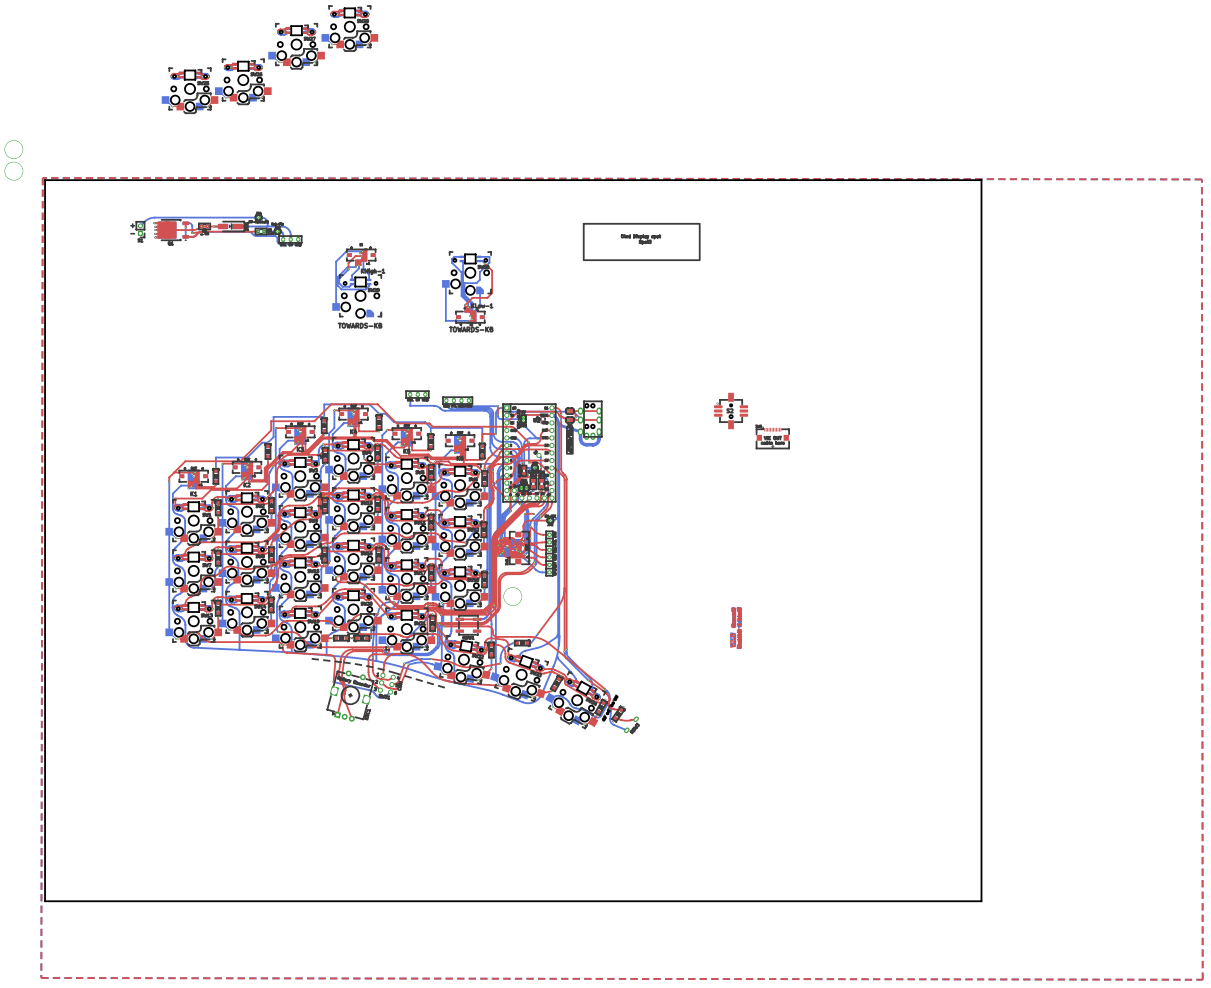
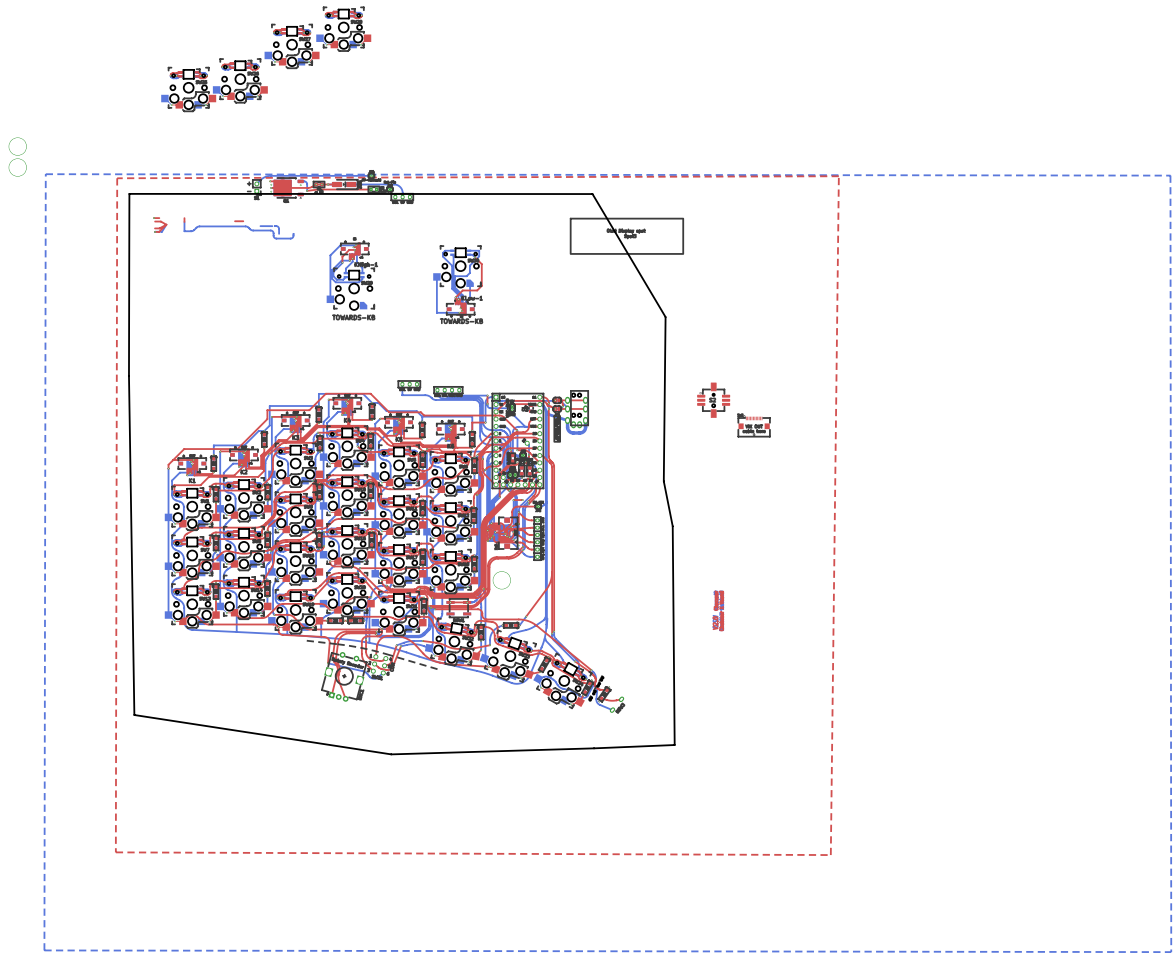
top zone outline: (42, 178) (41, 978) (1202, 979) (1201, 179) (42, 178) -> (838, 176) (117, 178) (115, 852) (830, 855) (838, 176)
bottom track: none -> (370, 175) (269, 175) (262, 178) (256, 183)
board edge: (45, 180) (981, 180) (981, 901) (45, 901) (45, 180) -> none
top track: none -> (270, 181) (275, 181)
via: none -> (270, 181)
bottom track: none -> (300, 181) (306, 182) (307, 190)
via: none -> (271, 184)
via: none -> (328, 184)
top track: none -> (336, 184) (316, 184) (308, 187) (271, 187)
bottom track: none -> (351, 184) (396, 184) (401, 189) (402, 197)
via: none -> (300, 185)
via: none -> (271, 187)
top track: none -> (371, 189) (307, 190)
via: none -> (307, 190)
via: none -> (271, 191)
board edge: none -> (129, 193) (592, 194) (665, 317) (663, 481) (672, 526) (674, 745) (391, 754) (134, 715) (128, 376) (129, 193)
part: none -> (402, 197)
bottom track: (257, 217) (153, 217) (146, 220) (140, 225) -> none
part position: (258, 217) -> (371, 175)
bottom track: (259, 217) (266, 219) (267, 226) -> none
bottom track: (185, 223) (191, 224) (192, 233) -> none
via: (155, 226) -> none
part position: (204, 226) -> (319, 184)
via: (213, 226) -> none
top track: (223, 226) (201, 226) (193, 230) (155, 230) -> none
part position: (231, 226) -> (344, 184)
bottom track: (267, 226) (286, 227) (290, 232) (290, 239) -> none
bottom track: (267, 226) (246, 226) -> none
via: (185, 227) -> none
part position: (140, 229) -> (256, 187)
via: (155, 230) -> none
part position: (173, 230) -> (288, 188)
top track: (203, 231) (192, 233) -> none
top track: (203, 231) (194, 236) (185, 236) -> none
top track: (258, 231) (203, 231) -> none
part position: (261, 231) -> (373, 189)
part position: (277, 231) -> (389, 189)
via: (155, 233) -> none
via: (192, 233) -> none
part: (290, 239) -> none

